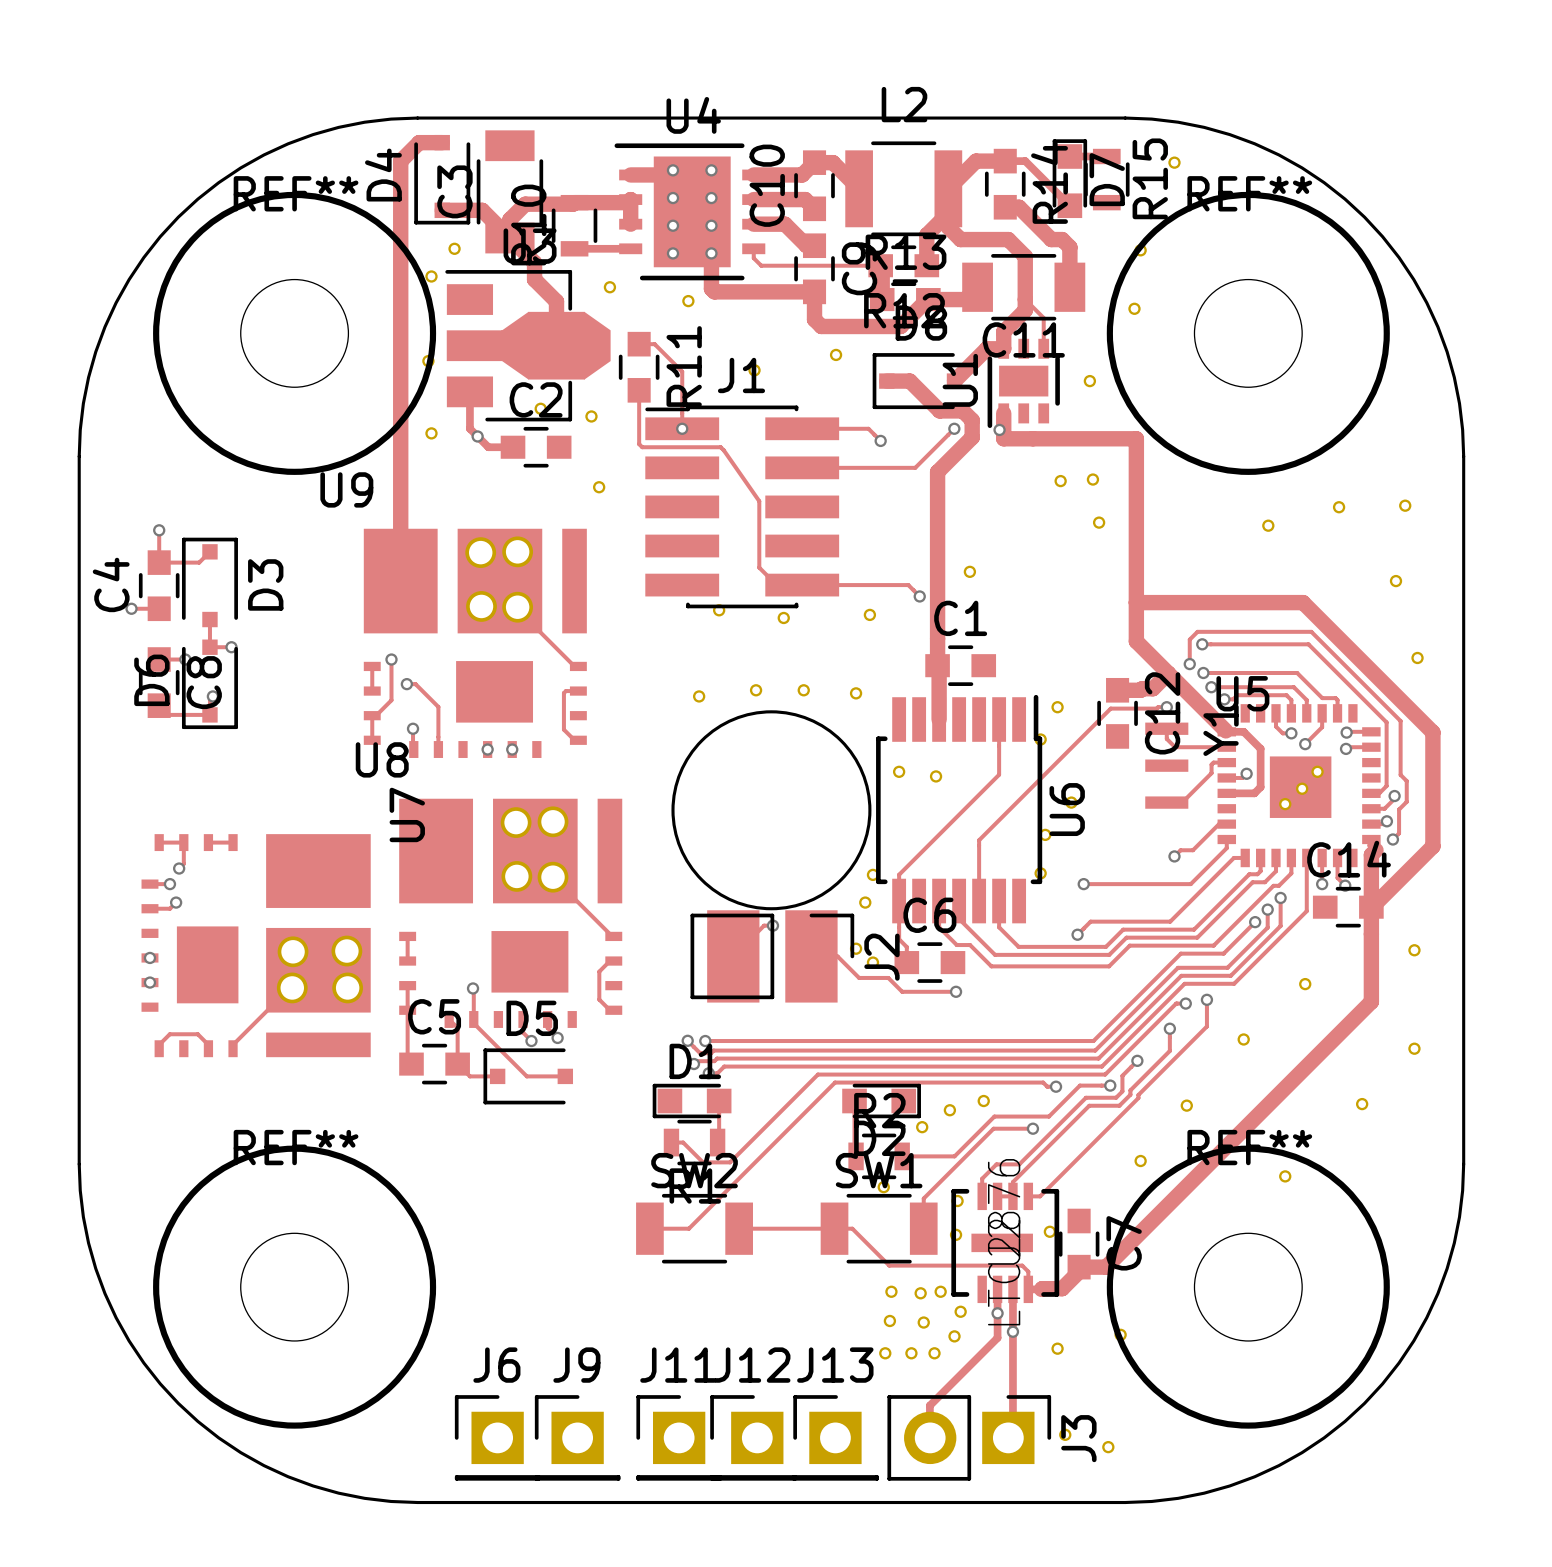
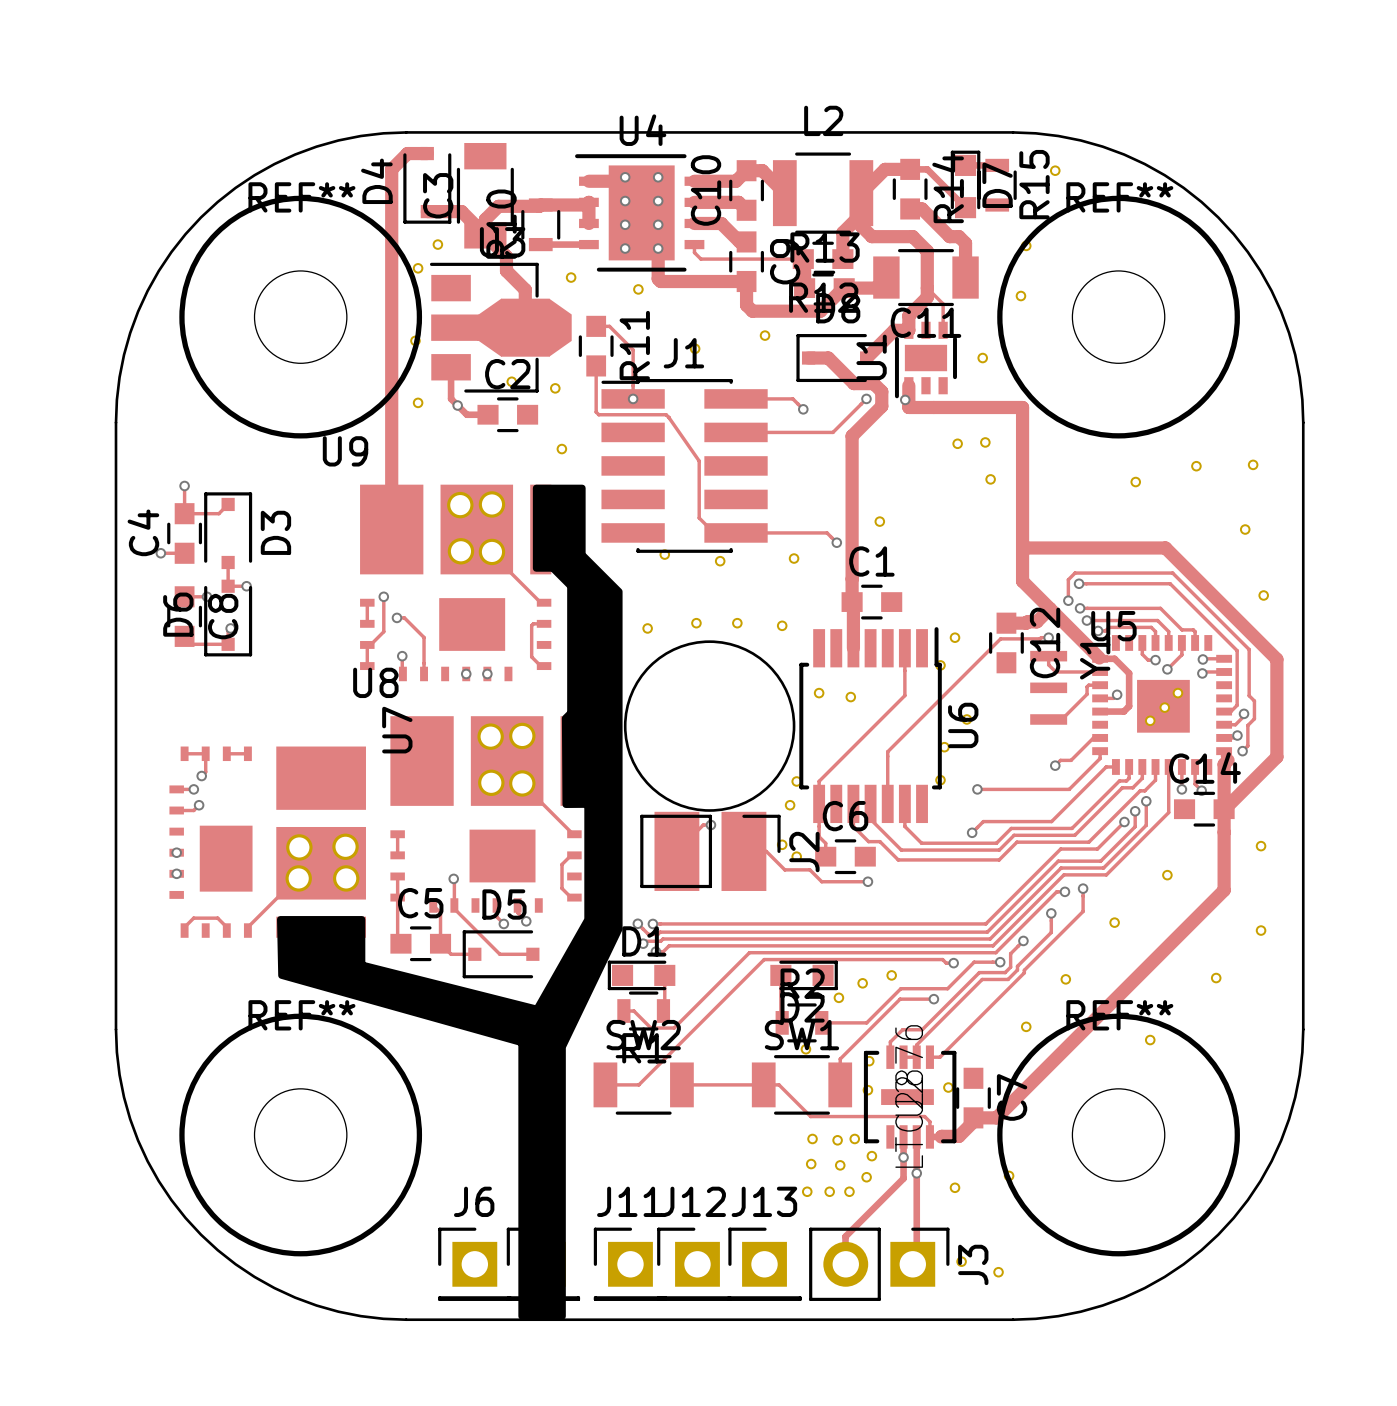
drawing: none -> [277, 484, 623, 1320]

